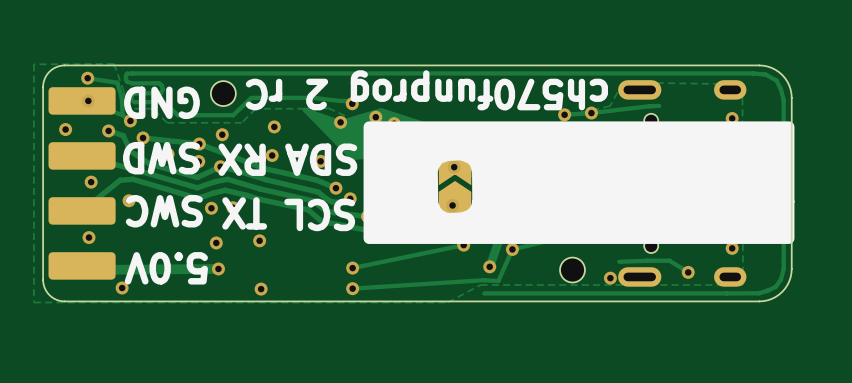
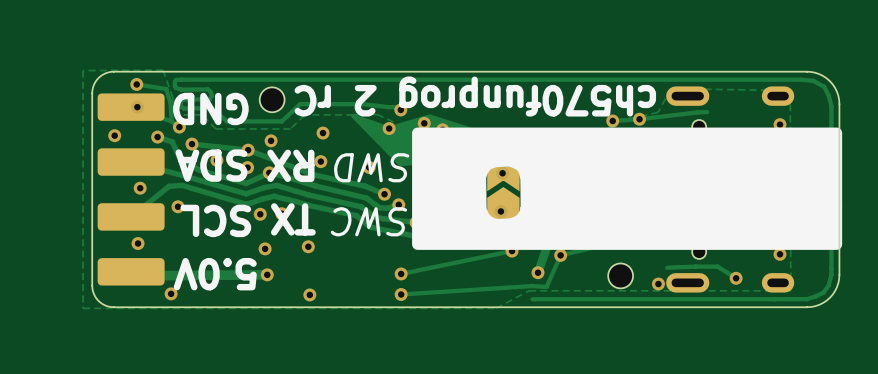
text: SWD (161, 158) -> SDA (211, 165)
text: SDA (321, 159) -> SWD (371, 167)
text: SWC (164, 211) -> SCL (215, 220)
text: SCL (319, 214) -> SWC (368, 221)

